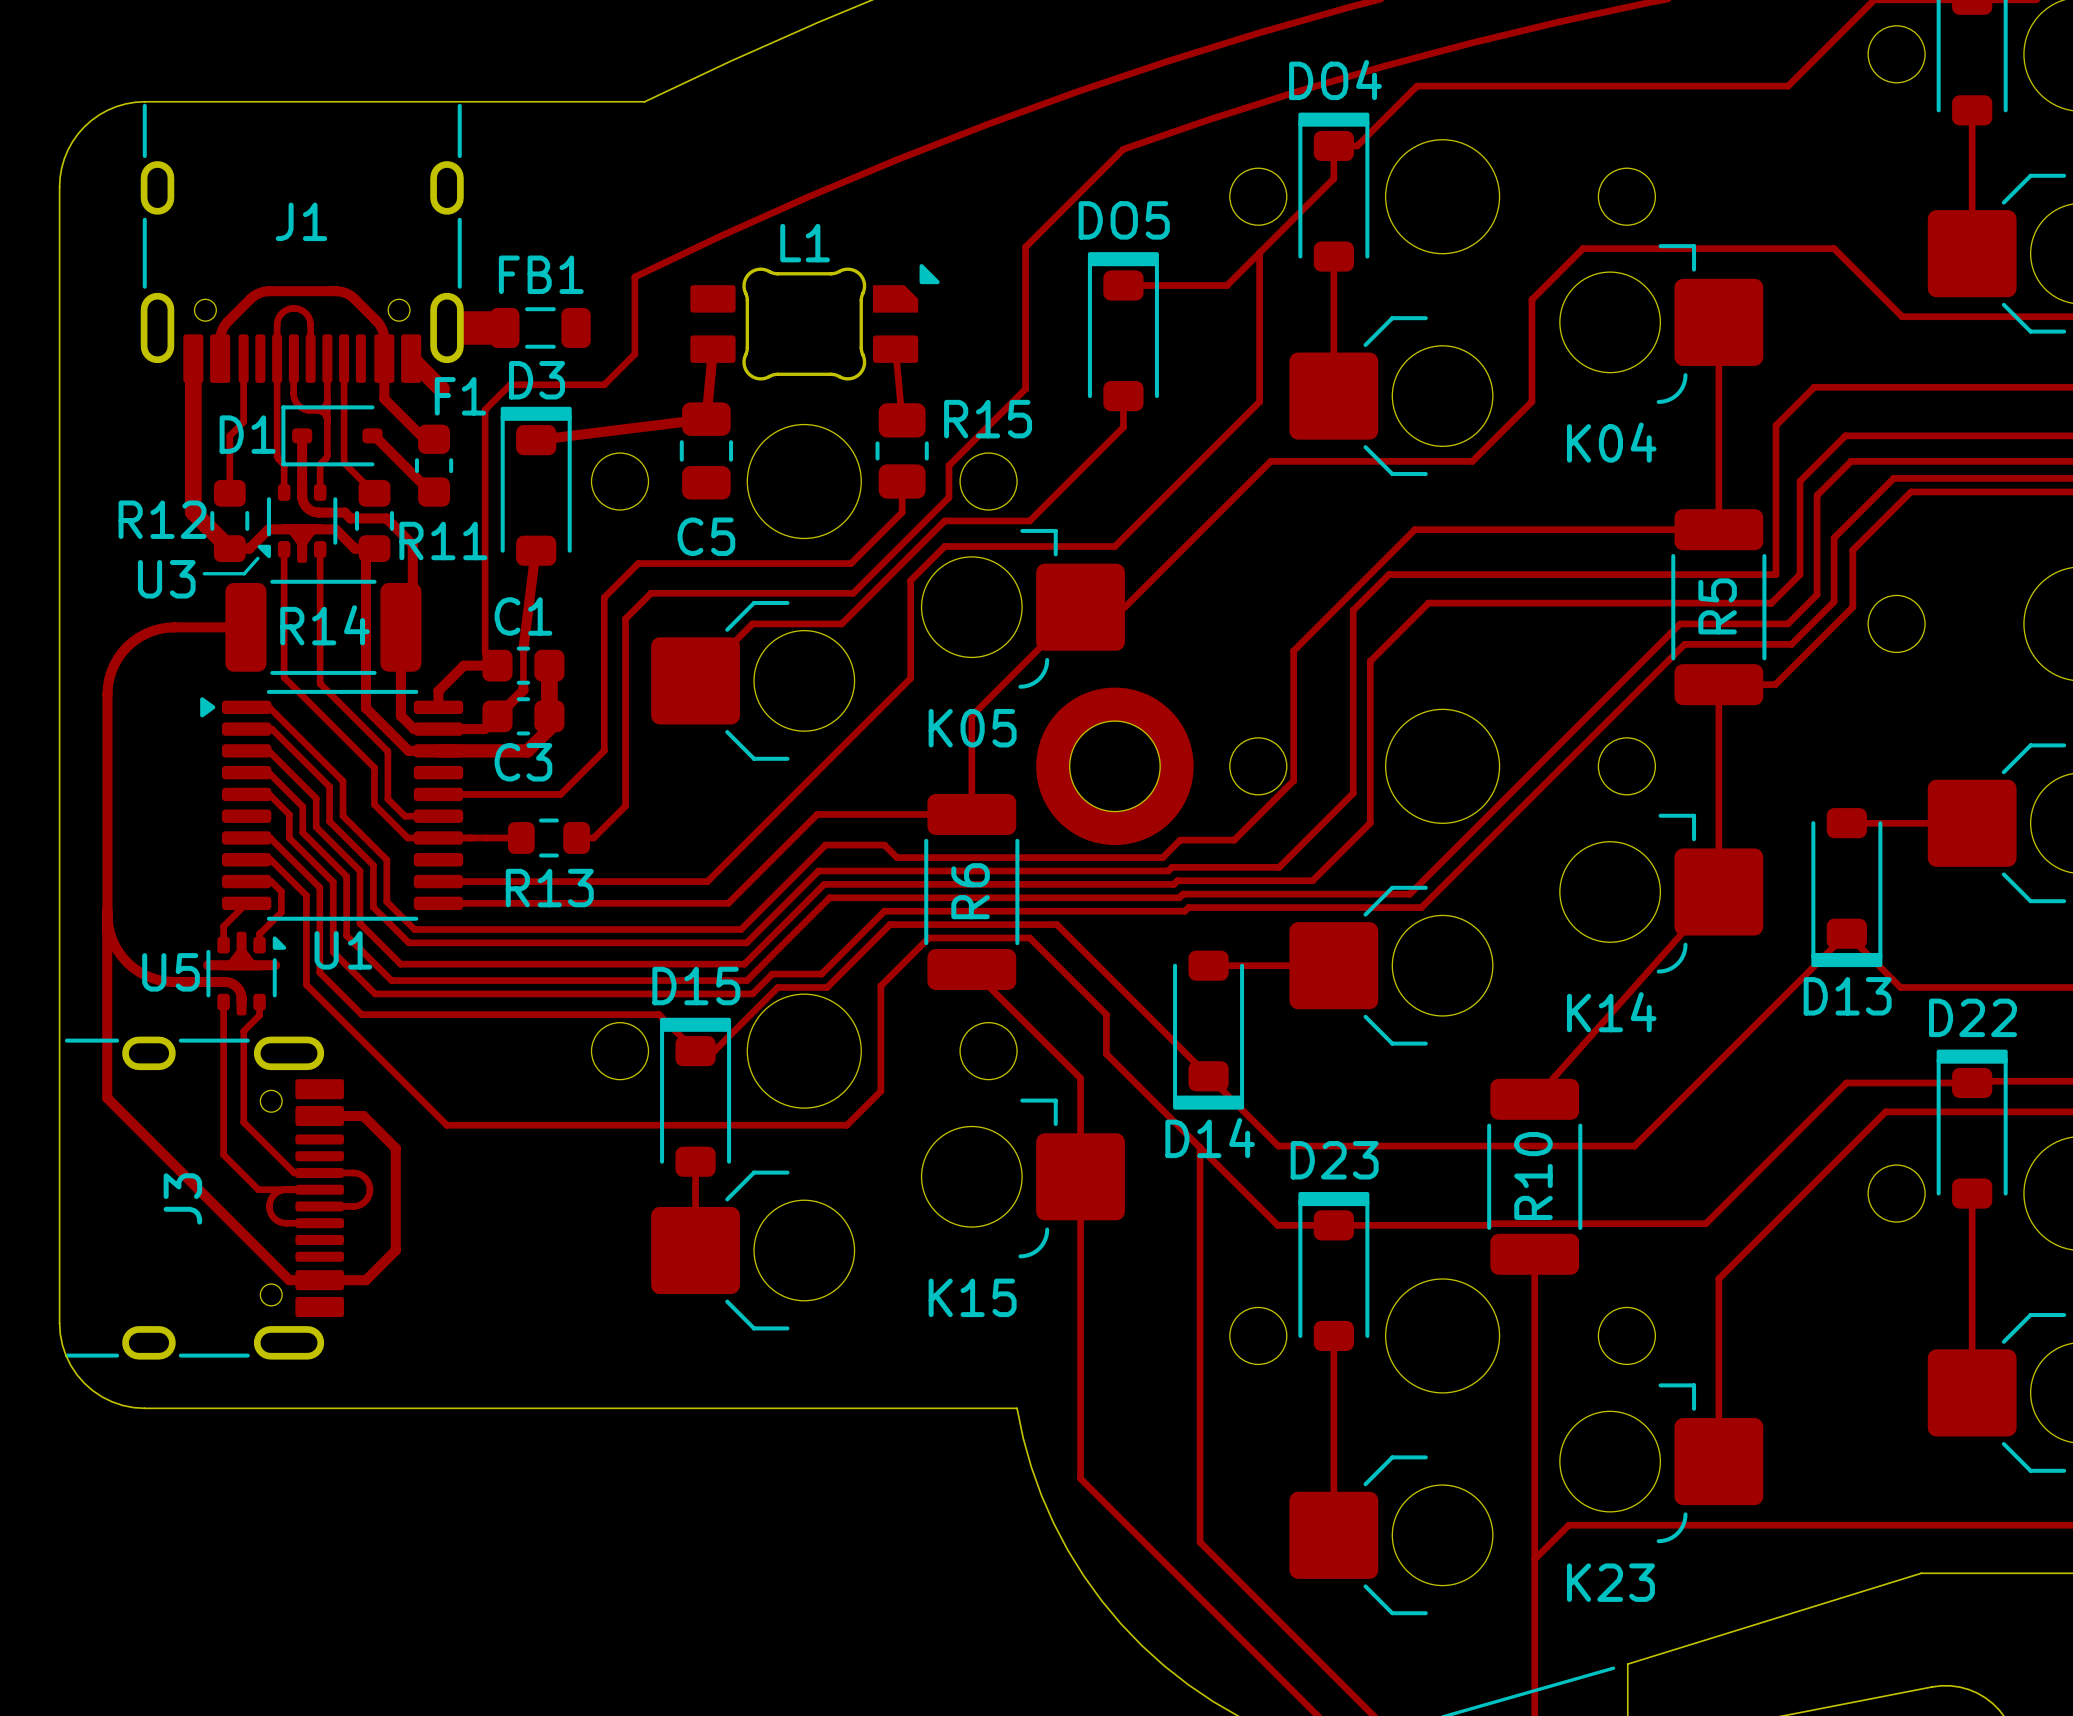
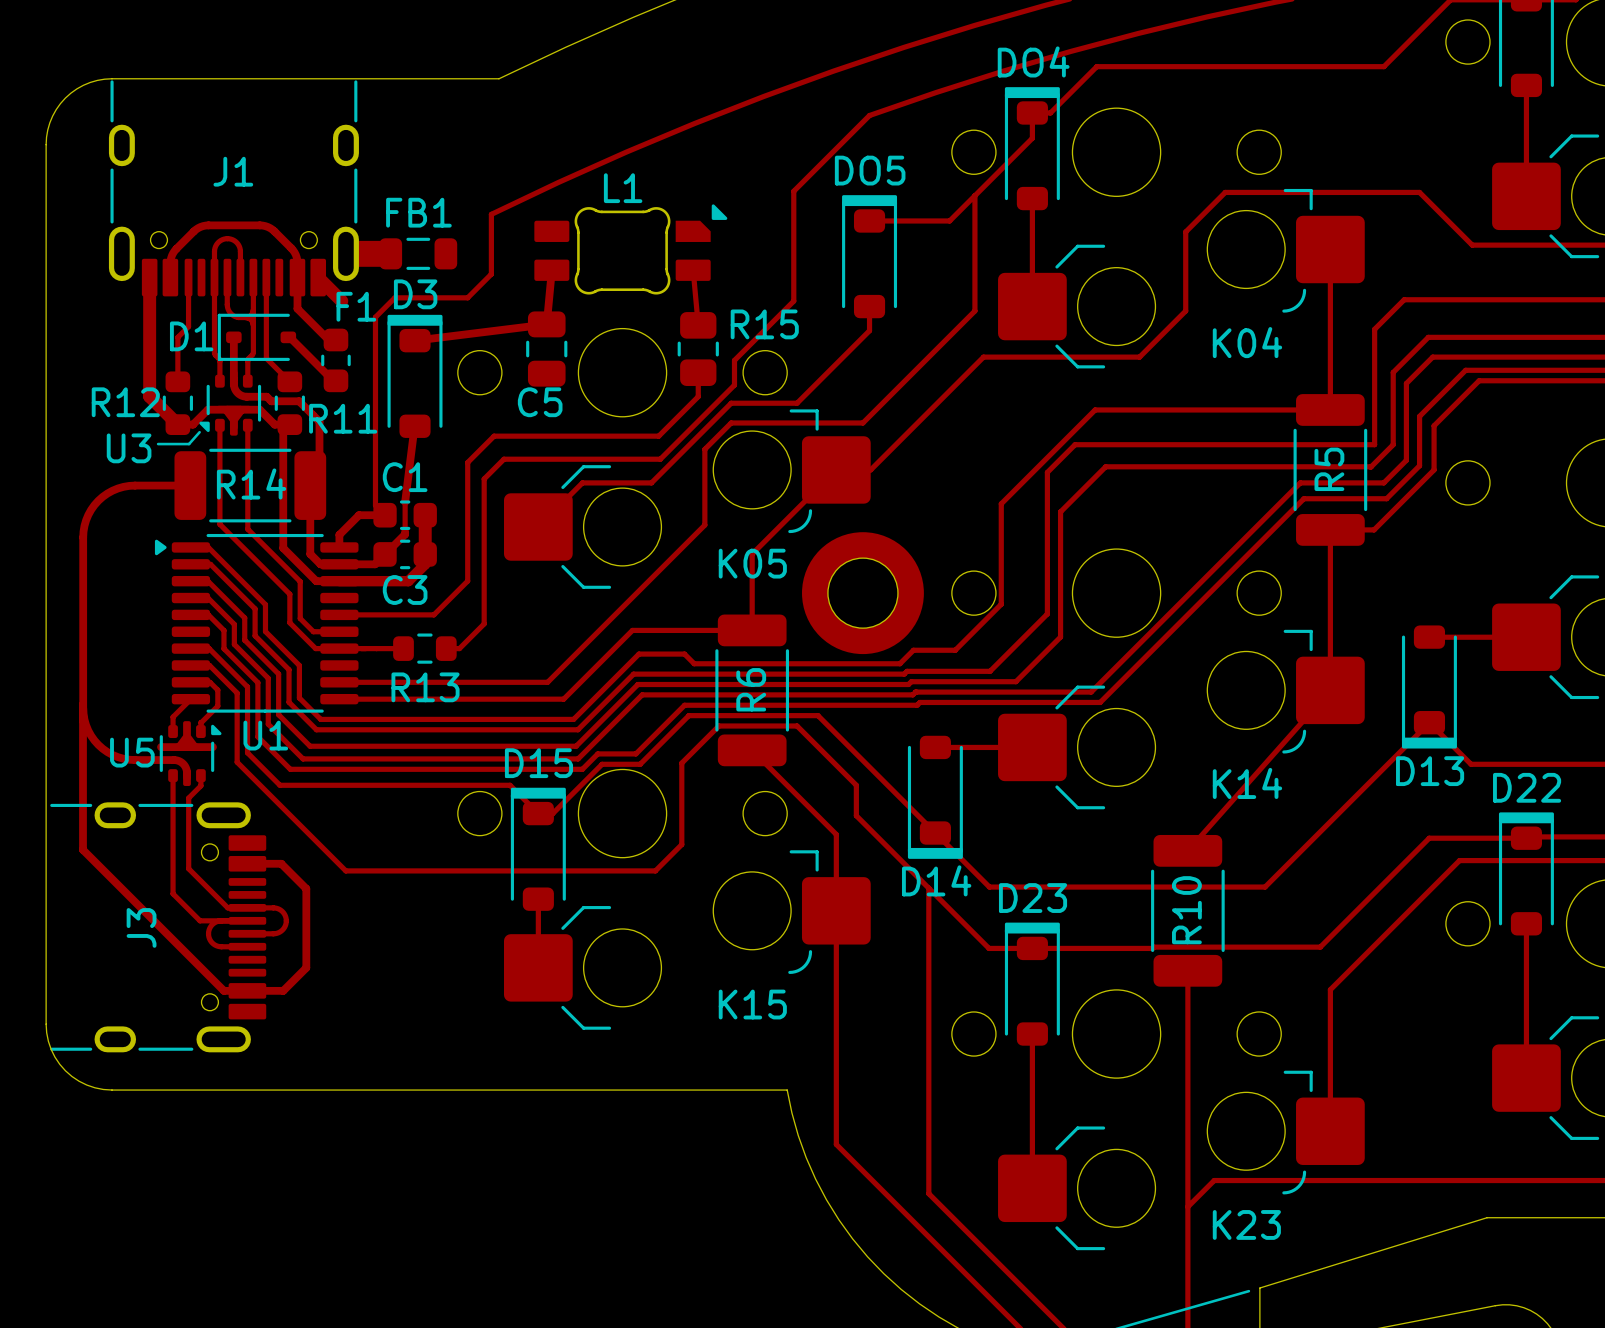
C5 name position: C5 (706, 536) -> C5 (540, 402)

